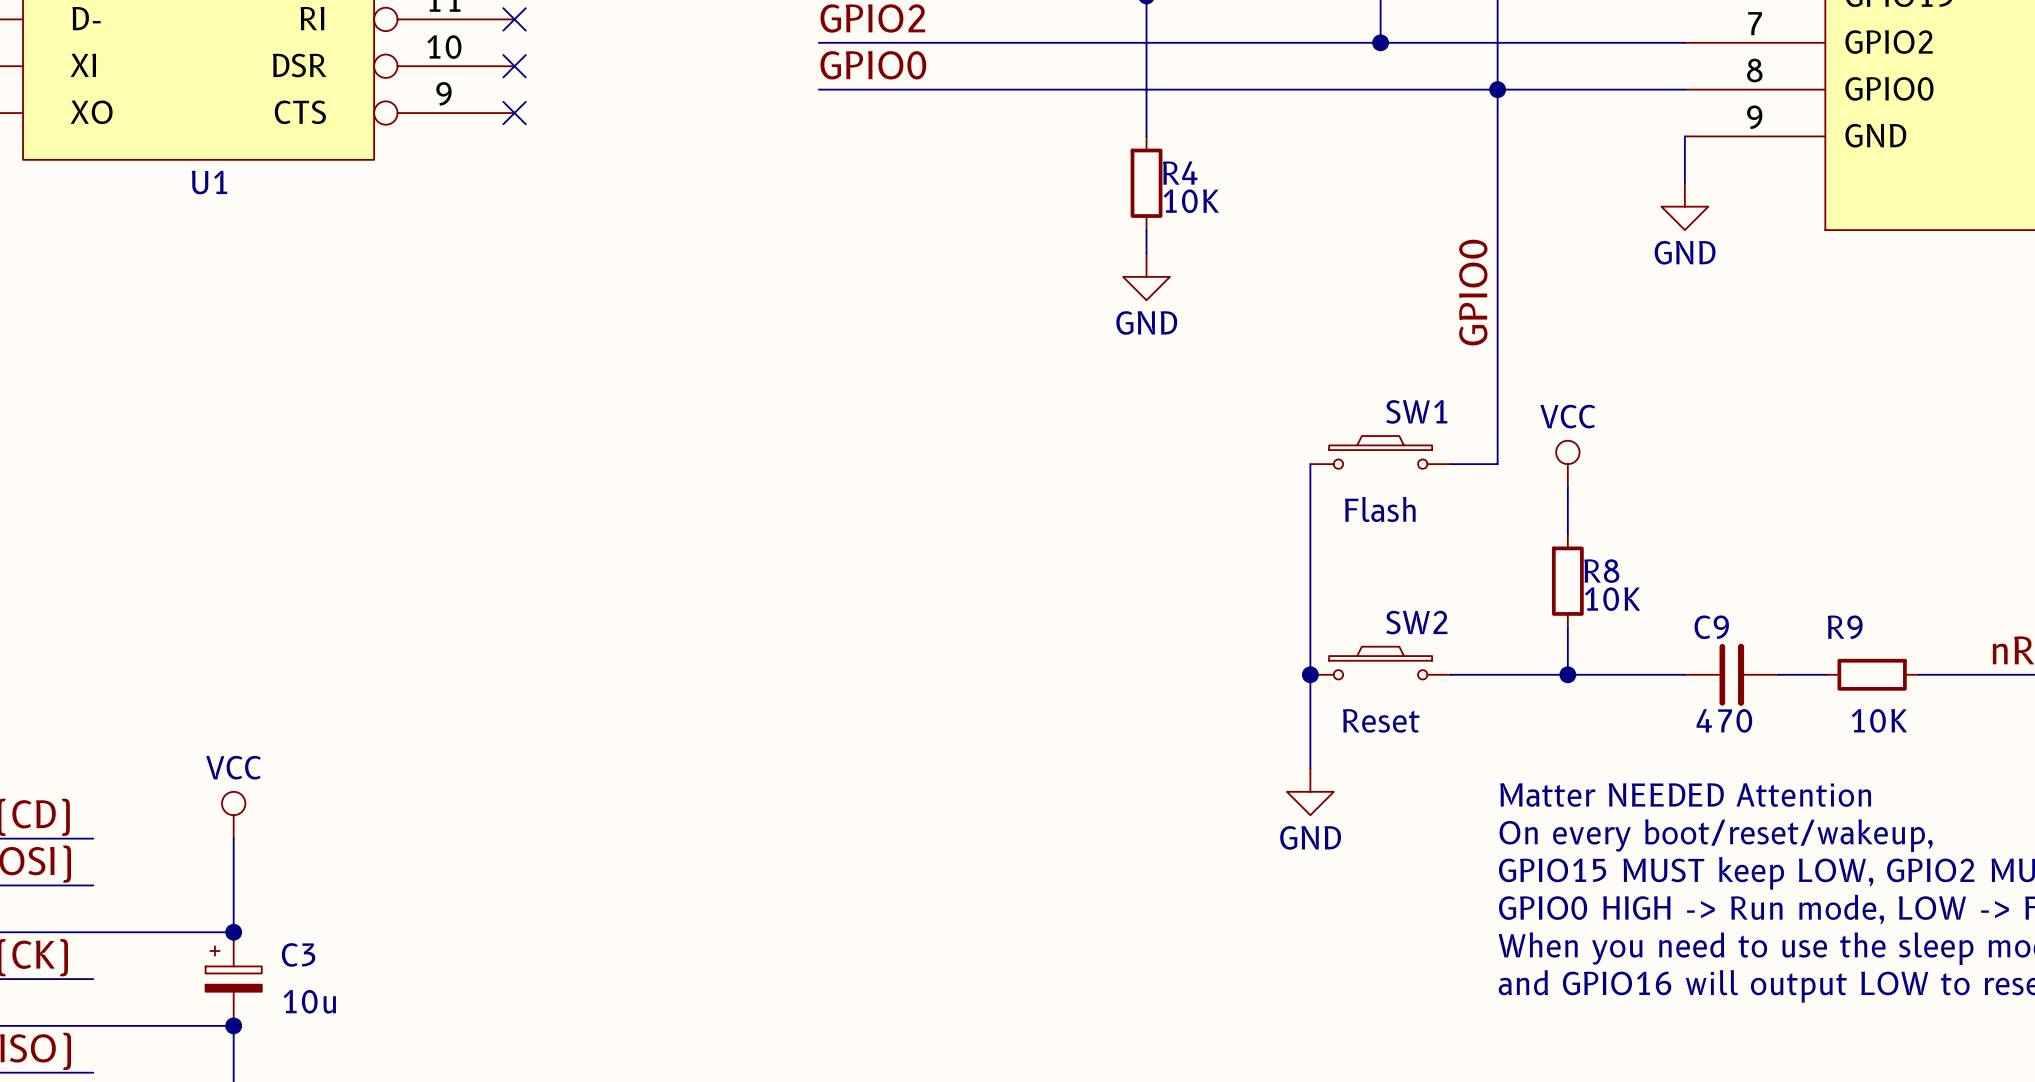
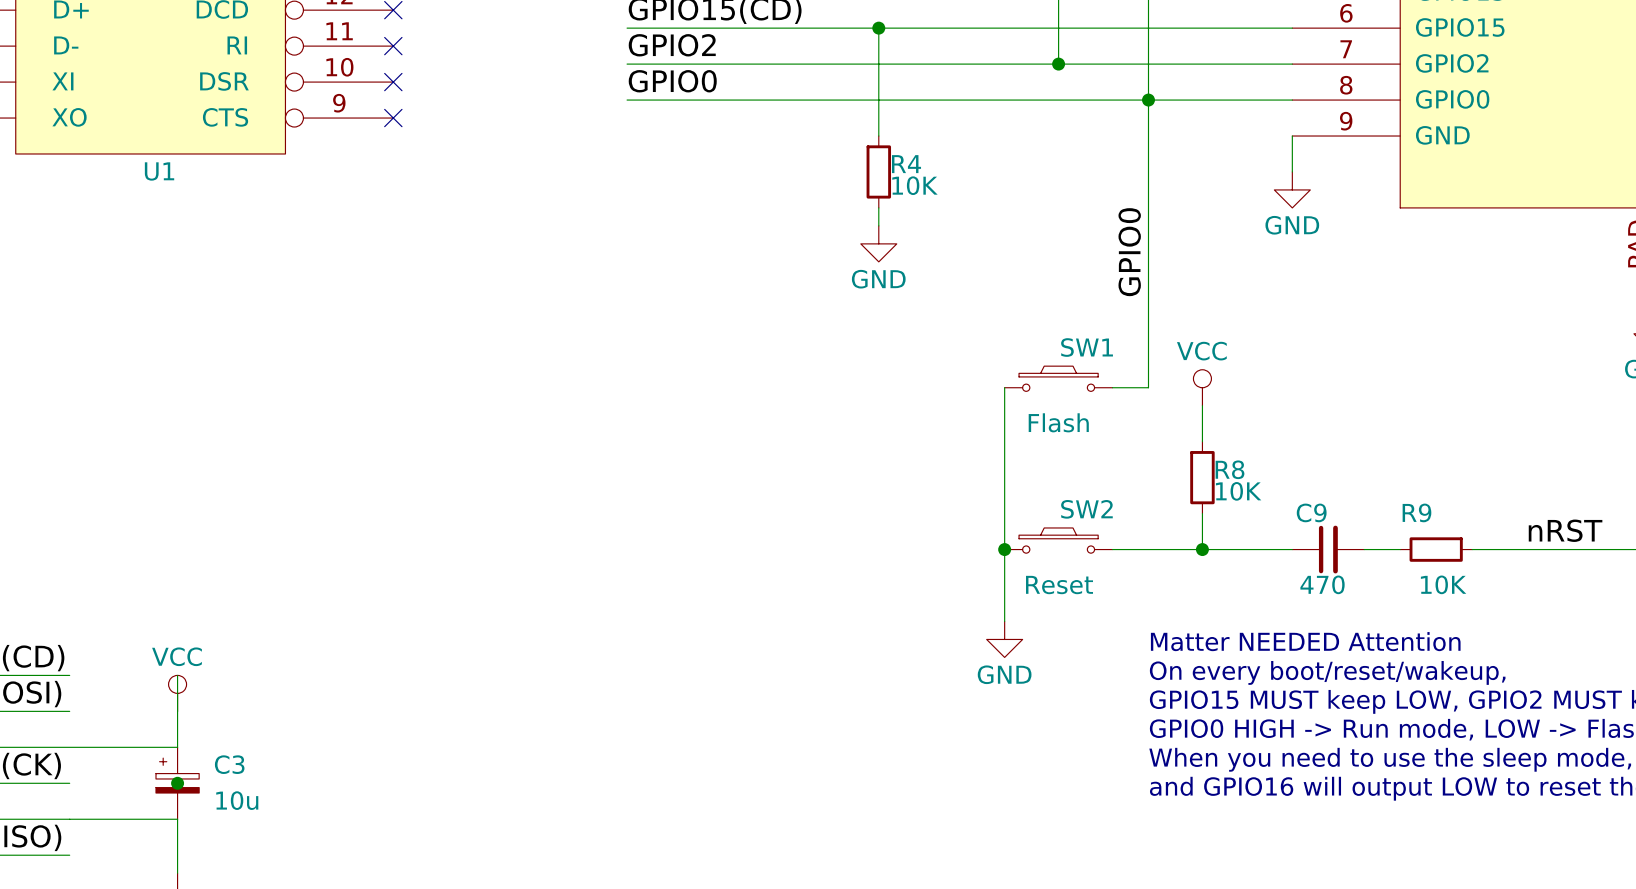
power symbol position: VCC (233, 815) -> VCC (177, 693)
junction: (233, 932) -> none
junction: none -> (177, 783)
junction: (233, 1025) -> none

